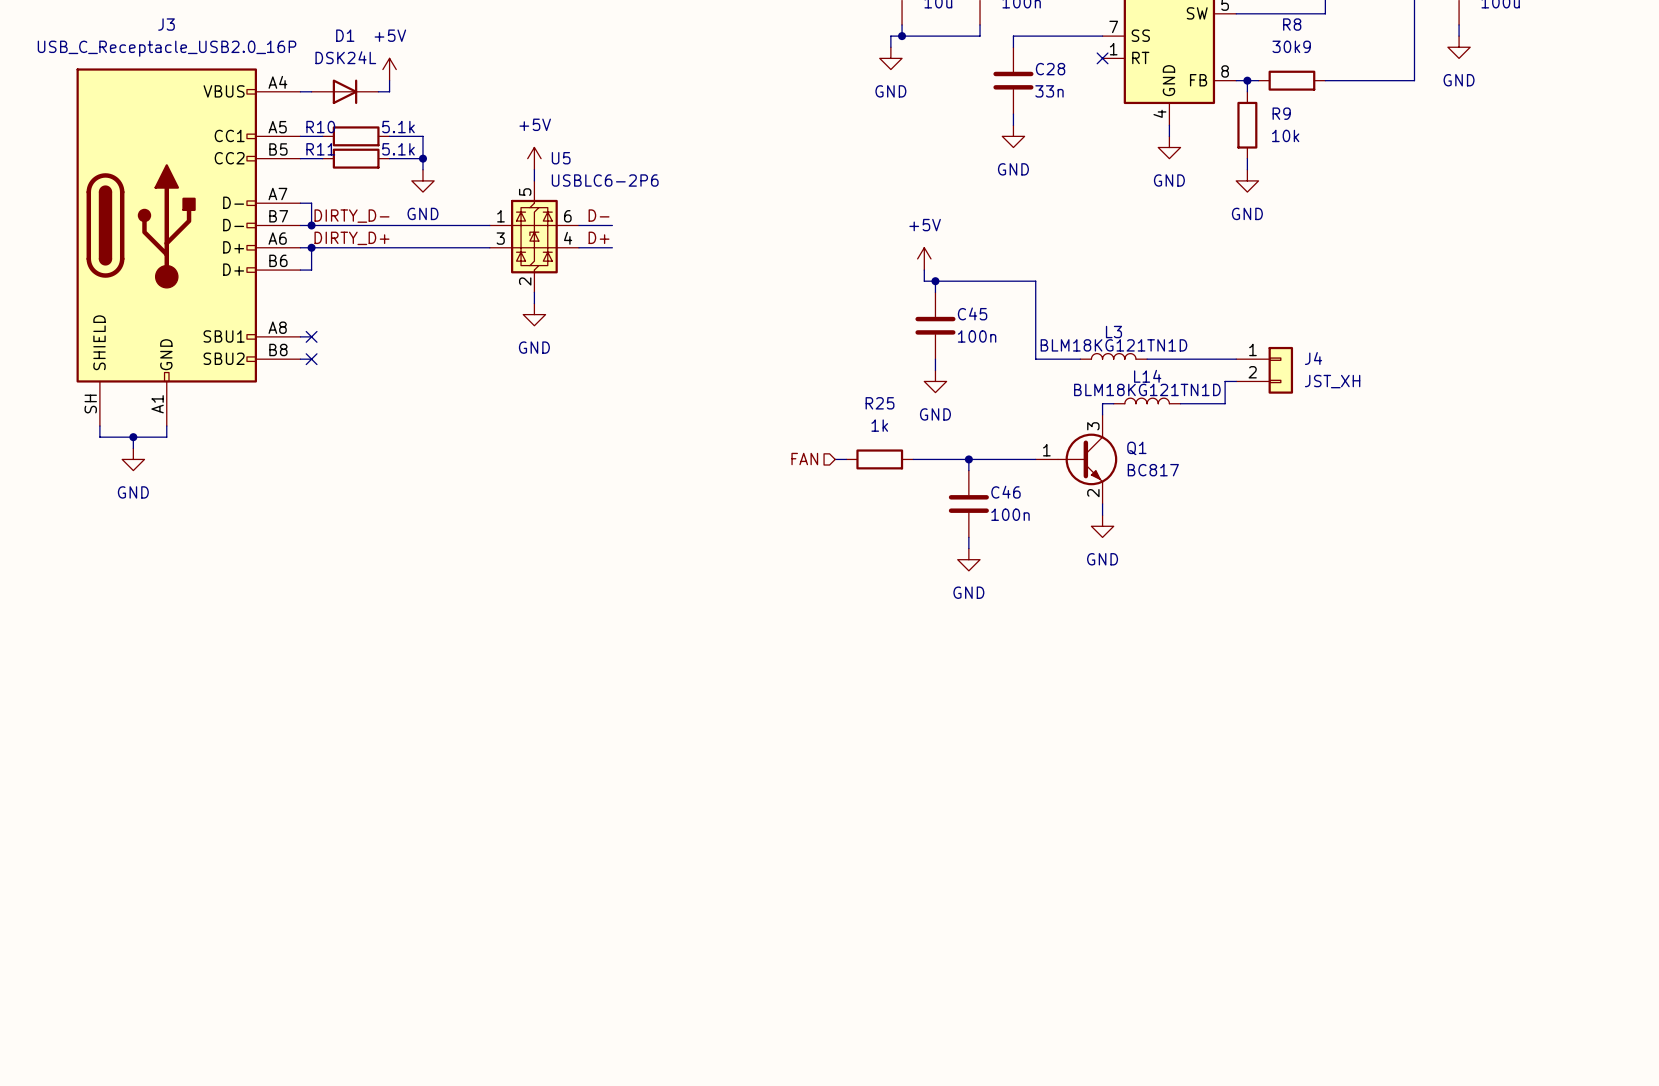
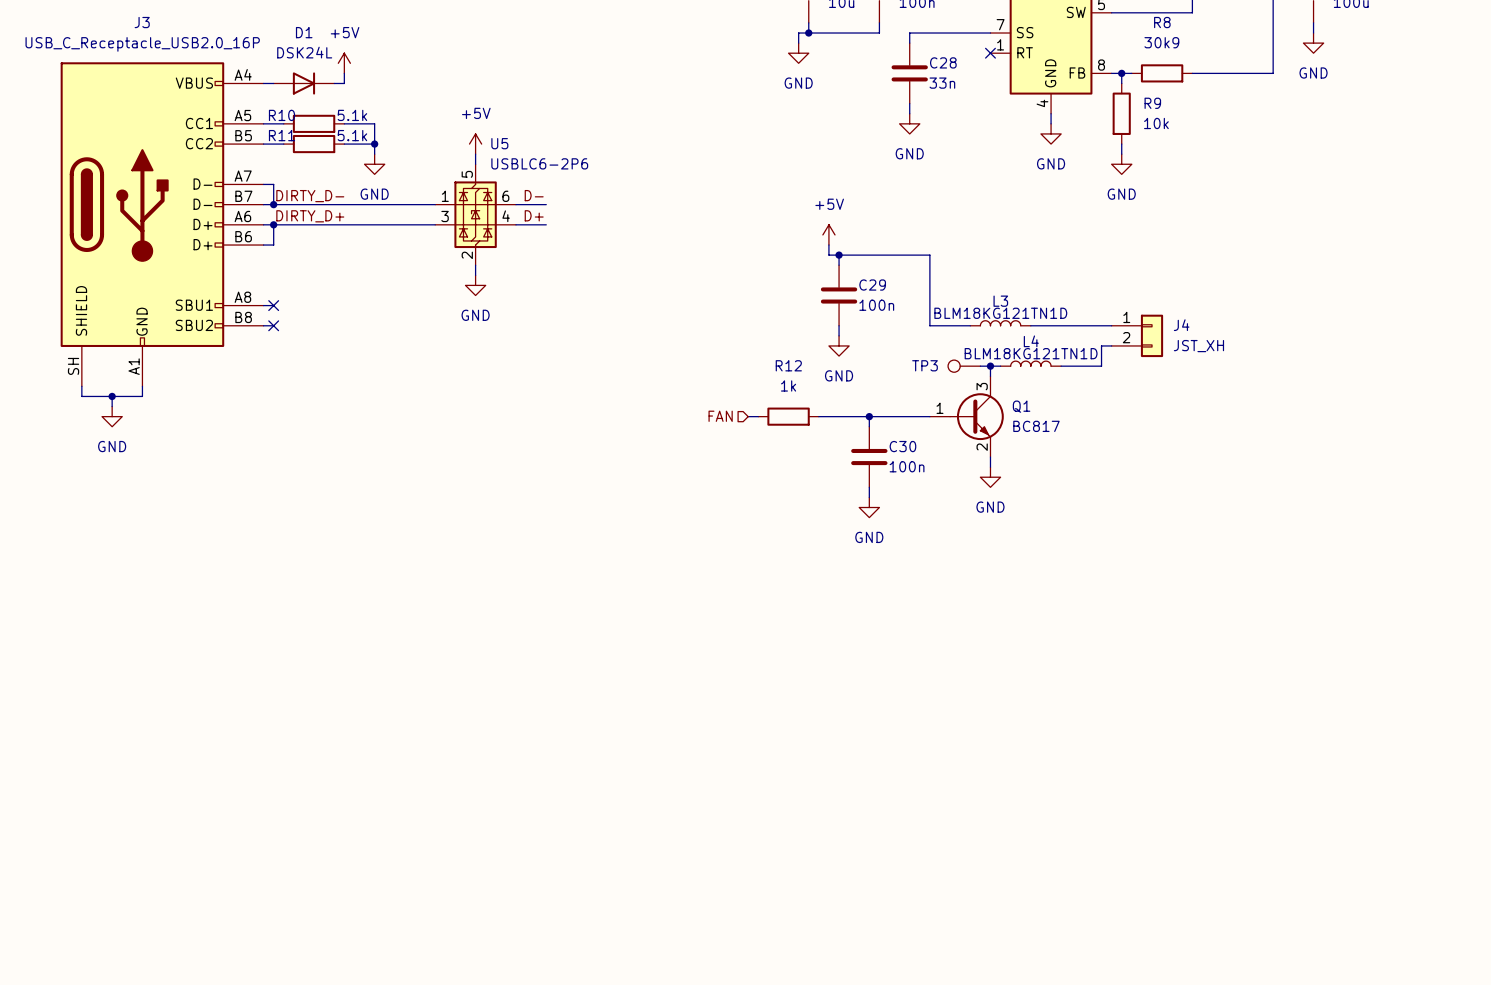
C45 name: C45 (972, 313) -> C29 (872, 285)
L14 name: L14 (1147, 376) -> L4 (1031, 341)
R25 name: R25 (880, 403) -> R12 (788, 365)
TP3: none -> (964, 366)
wire: none -> (980, 366) (990, 366)
junction: none -> (990, 366)
C46 name: C46 (1005, 492) -> C30 (902, 446)

